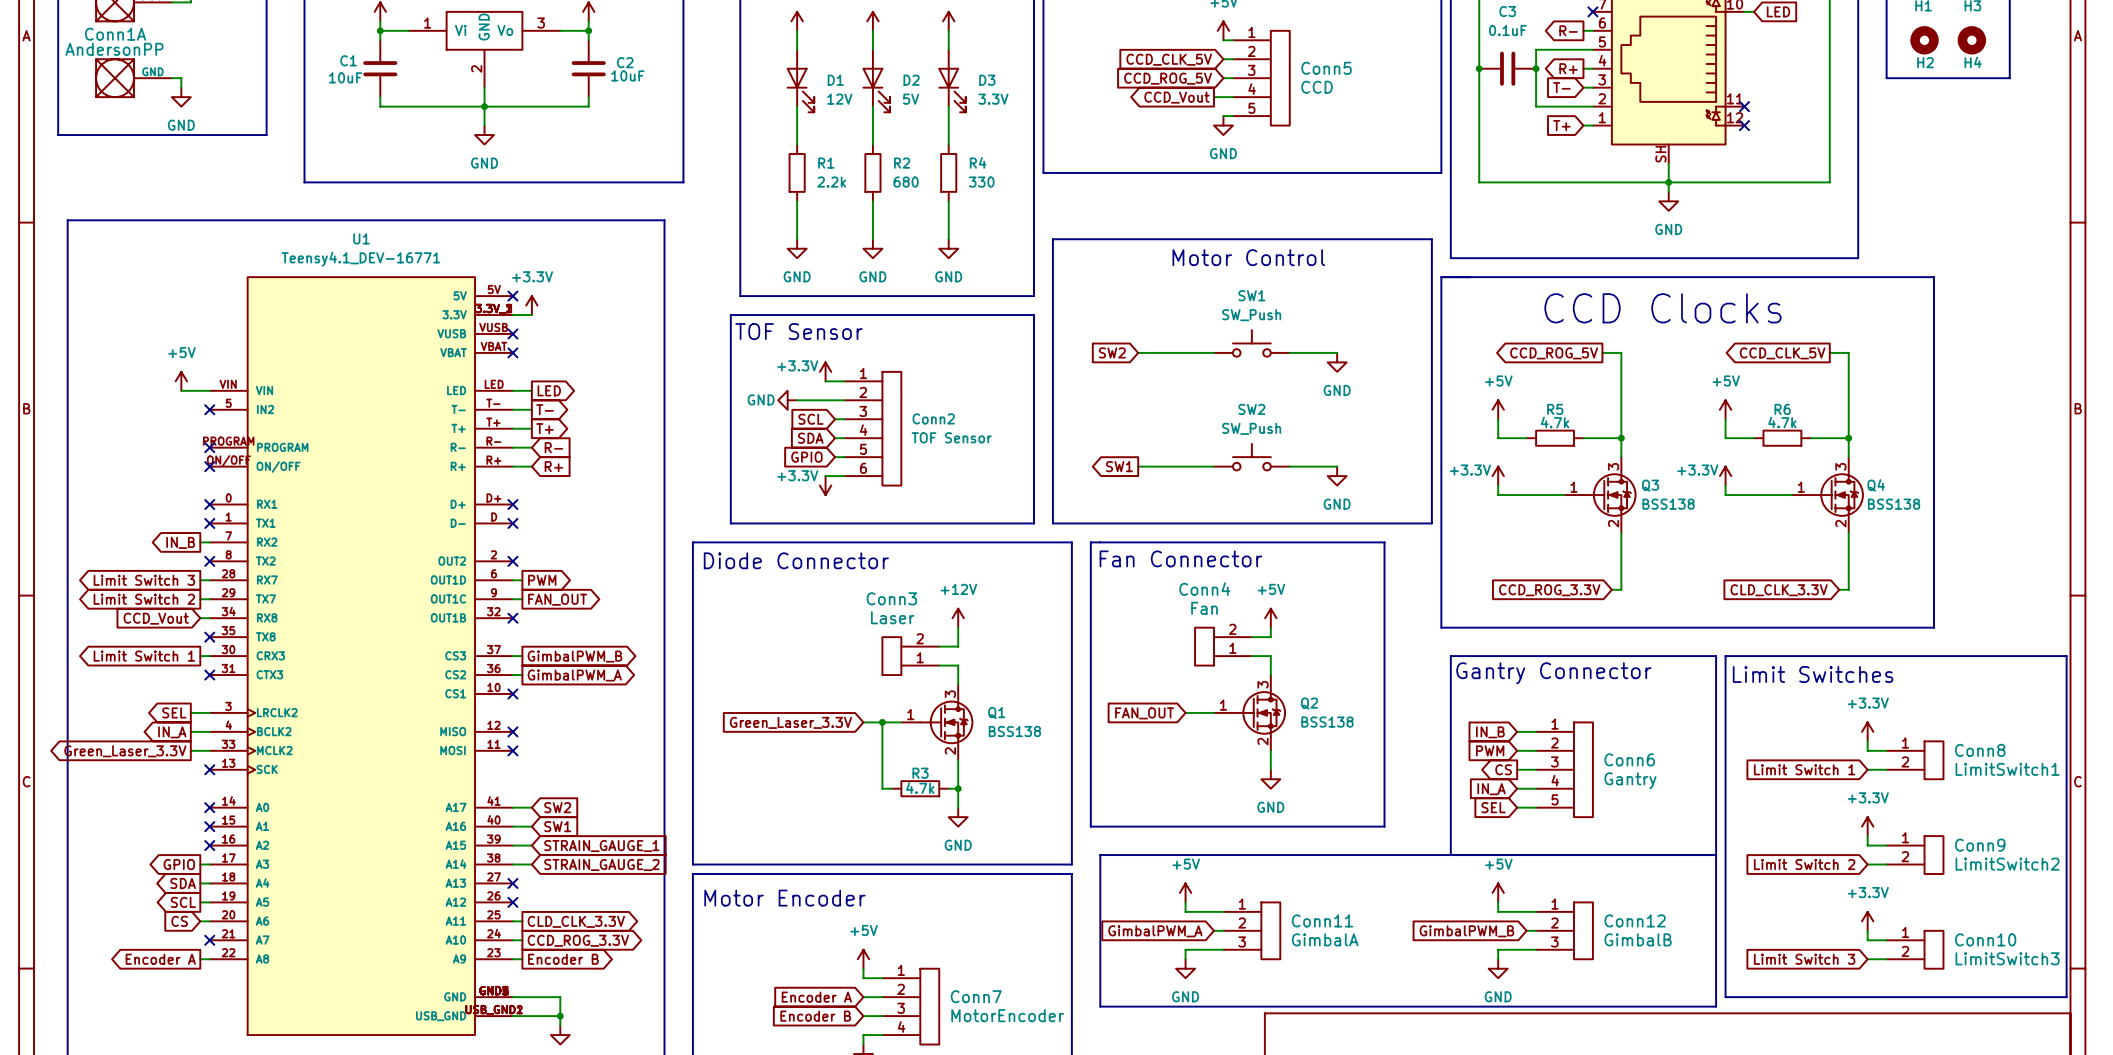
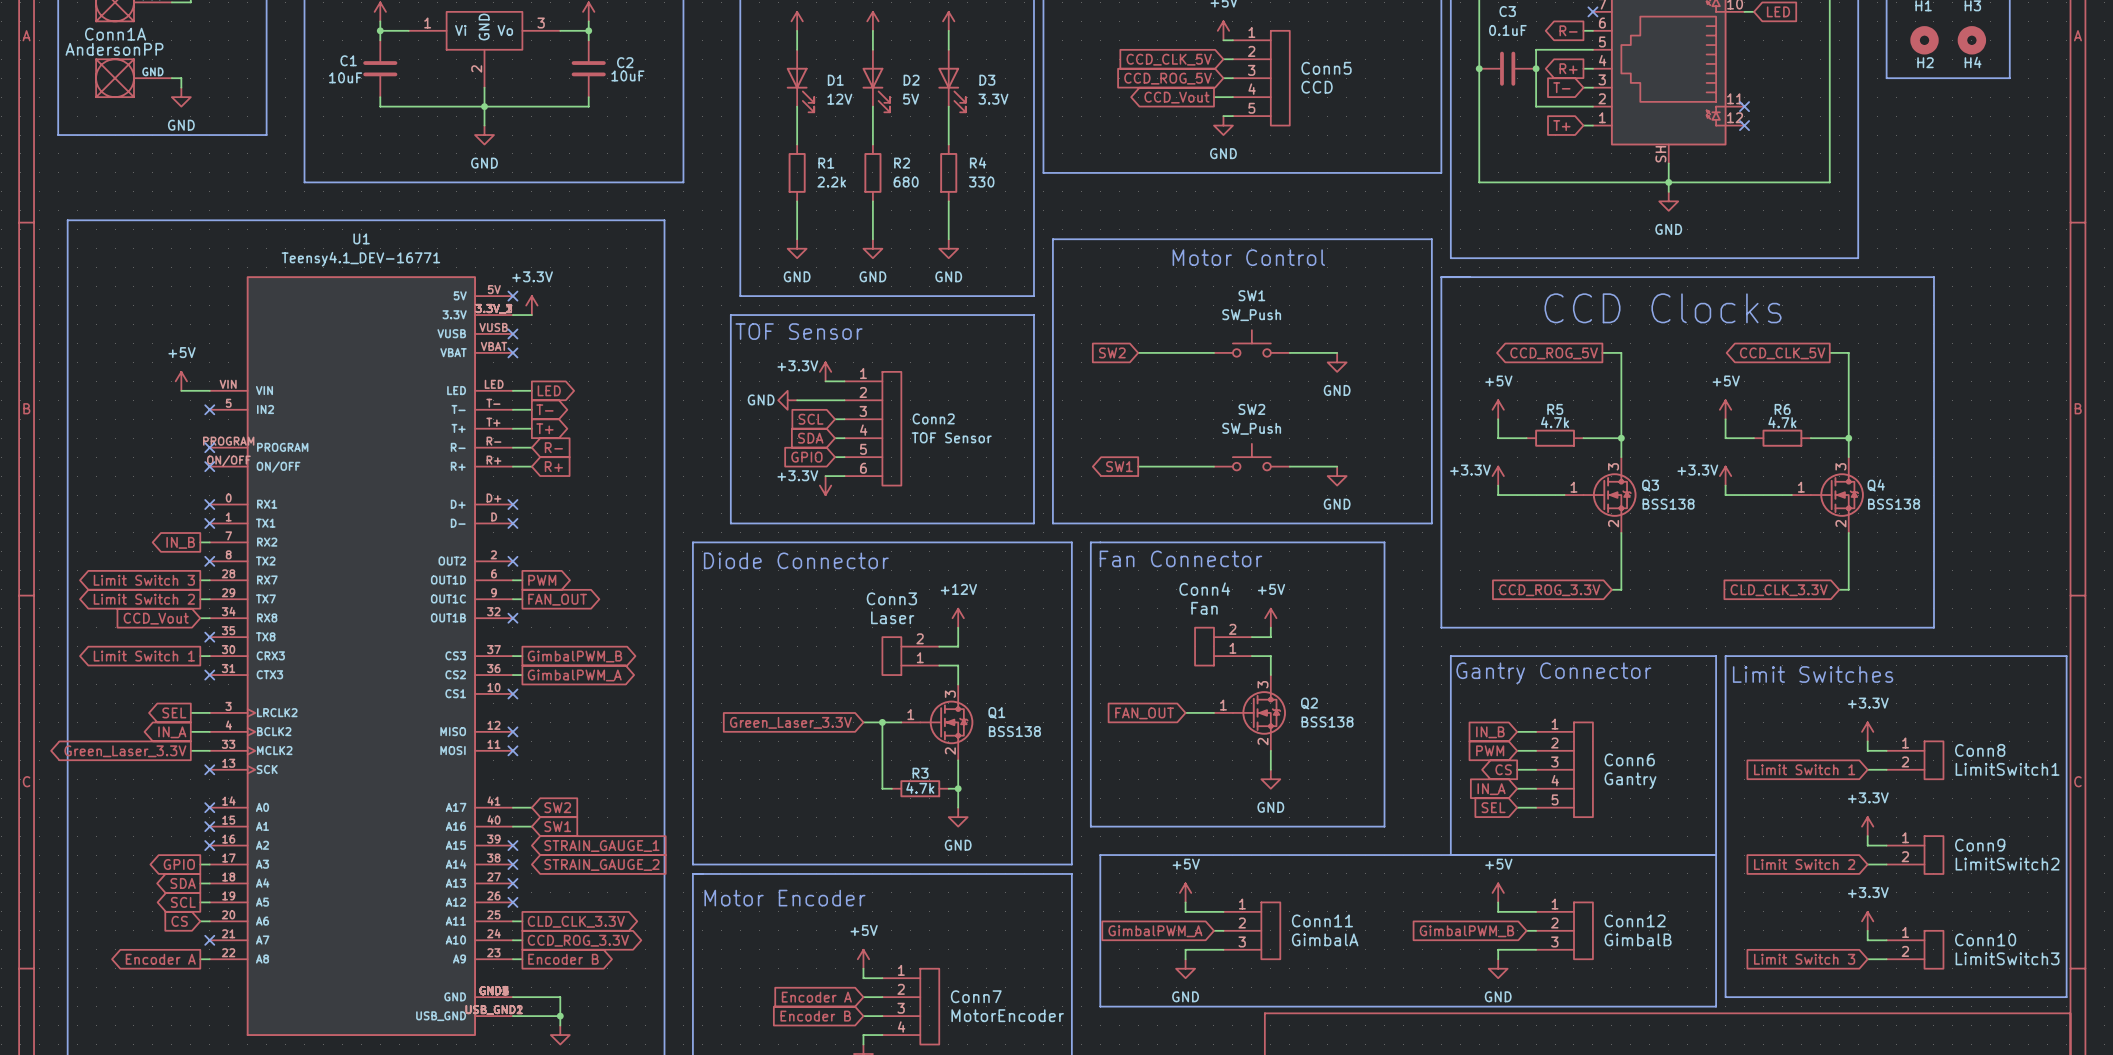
wire: (512, 845) (531, 845) -> none
no-connect mark: none -> (512, 845)
wire: (512, 864) (531, 864) -> none
no-connect mark: none -> (512, 864)

